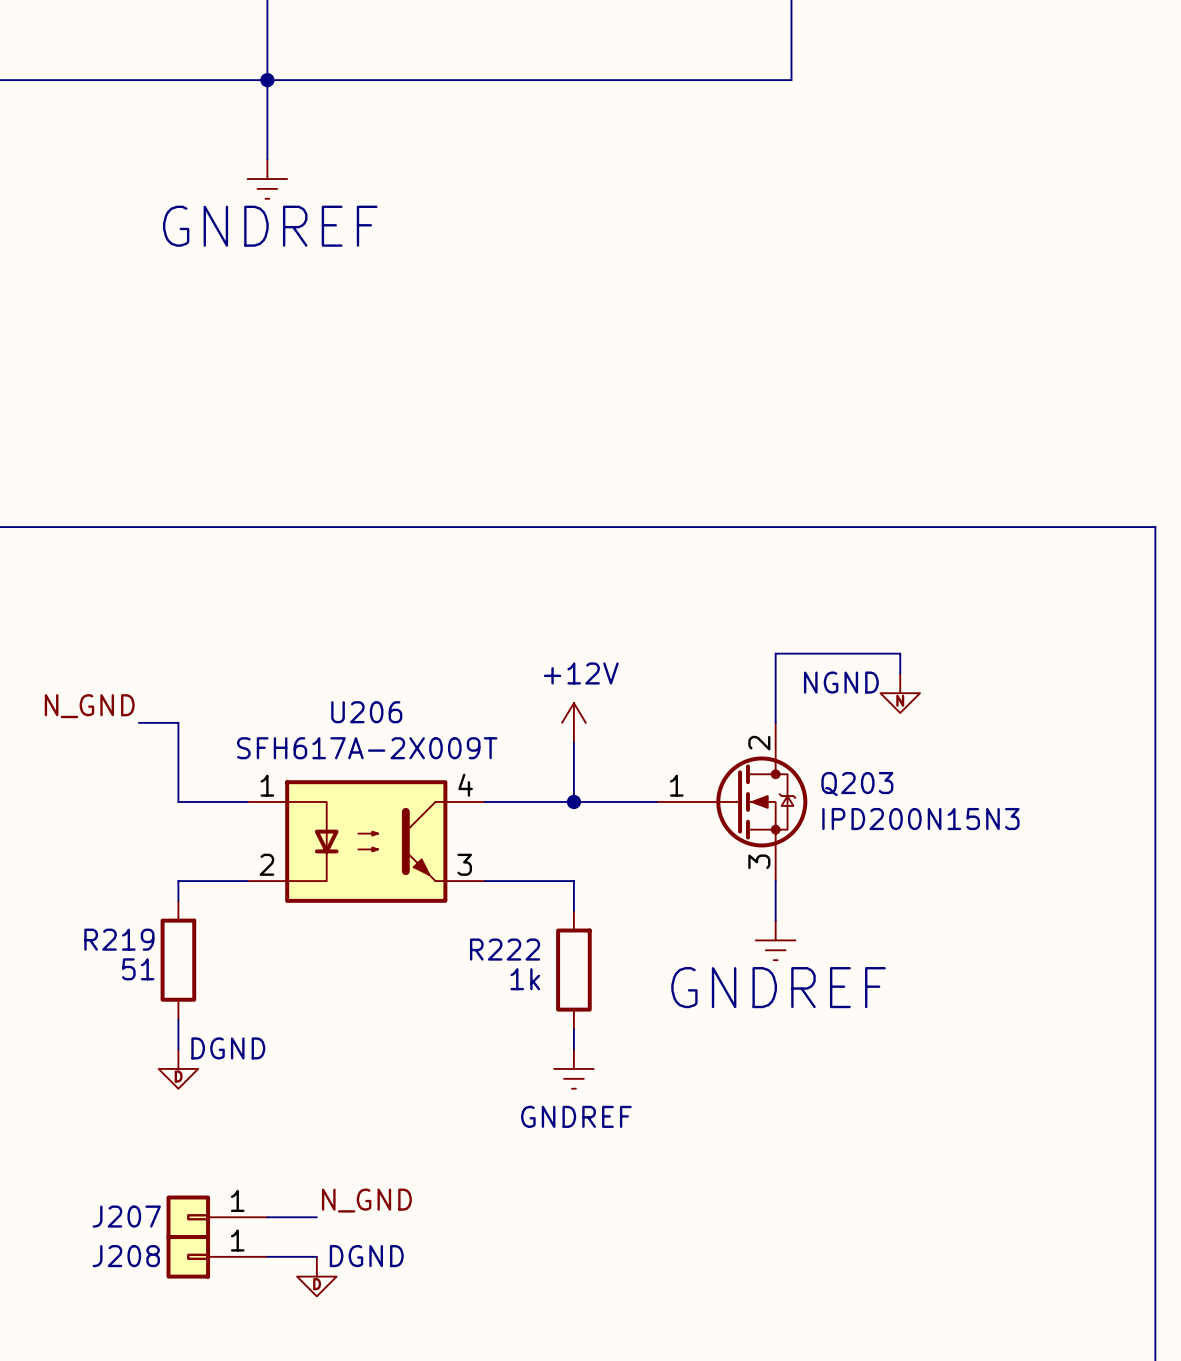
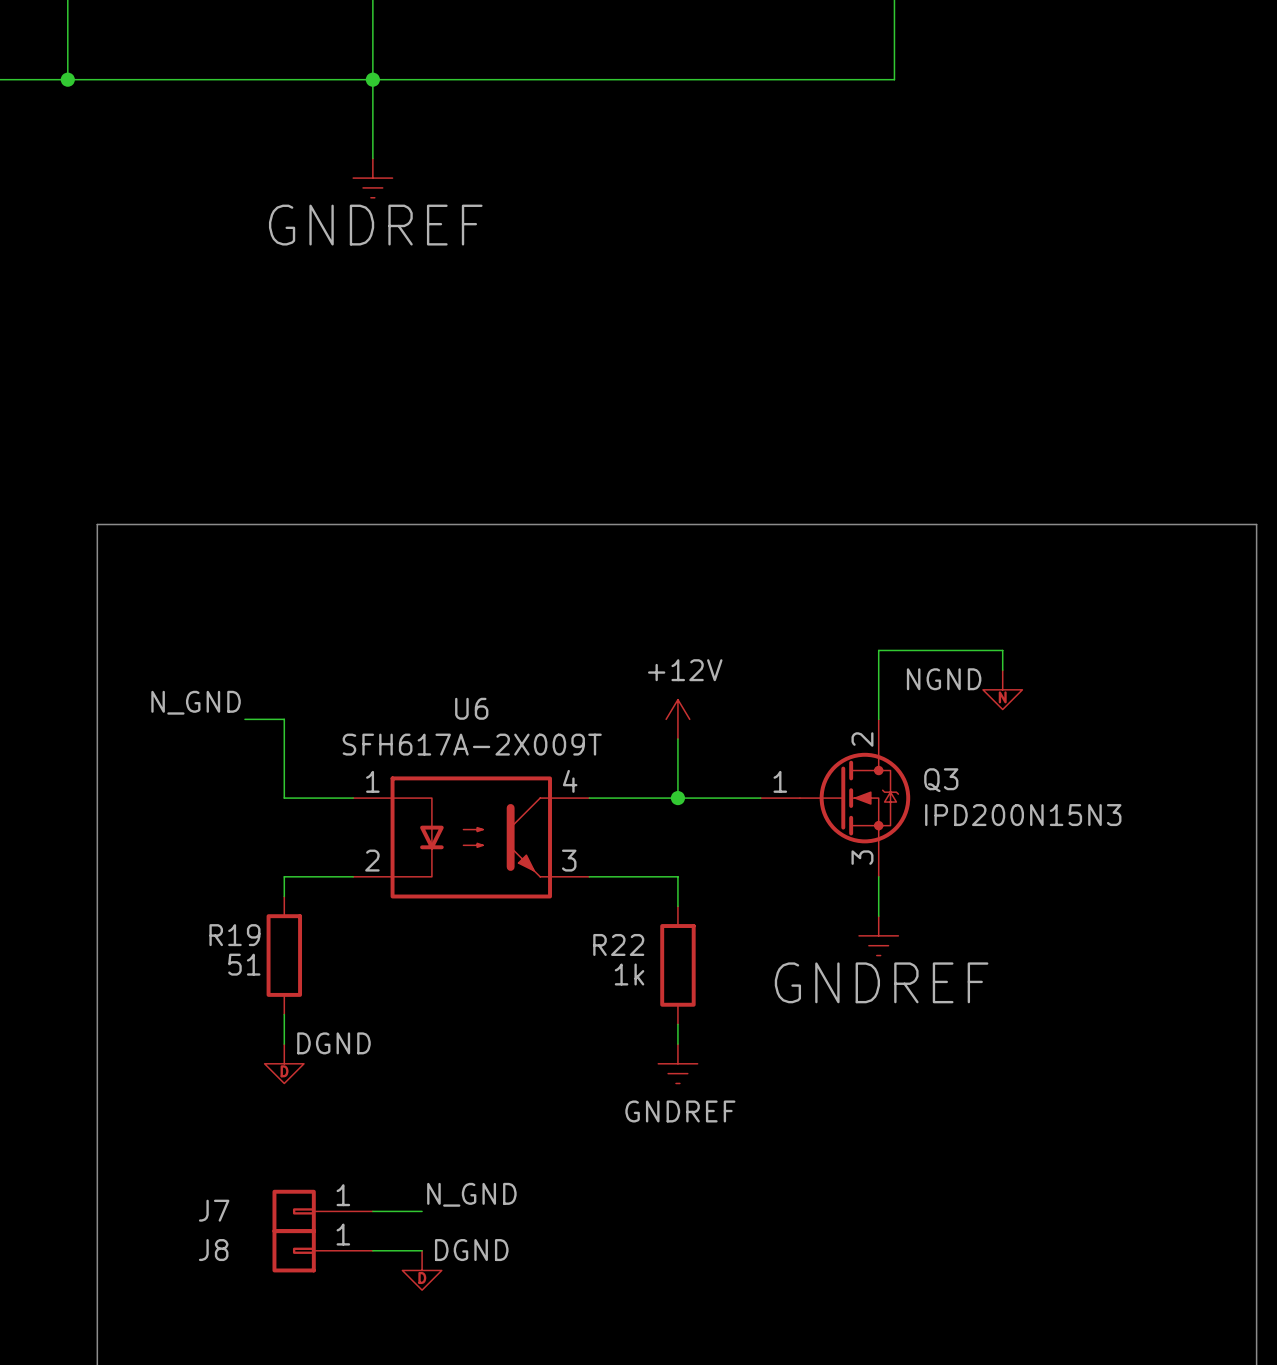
U206 name: U206 (366, 712) -> U6 (471, 708)
Q203 name: Q203 (857, 783) -> Q3 (941, 780)
R219 name: R219 (119, 939) -> R19 (234, 935)
R222 name: R222 (505, 949) -> R22 (618, 944)
J207 name: J207 (126, 1216) -> J7 (214, 1210)
J208 name: J208 (126, 1256) -> J8 (213, 1250)

